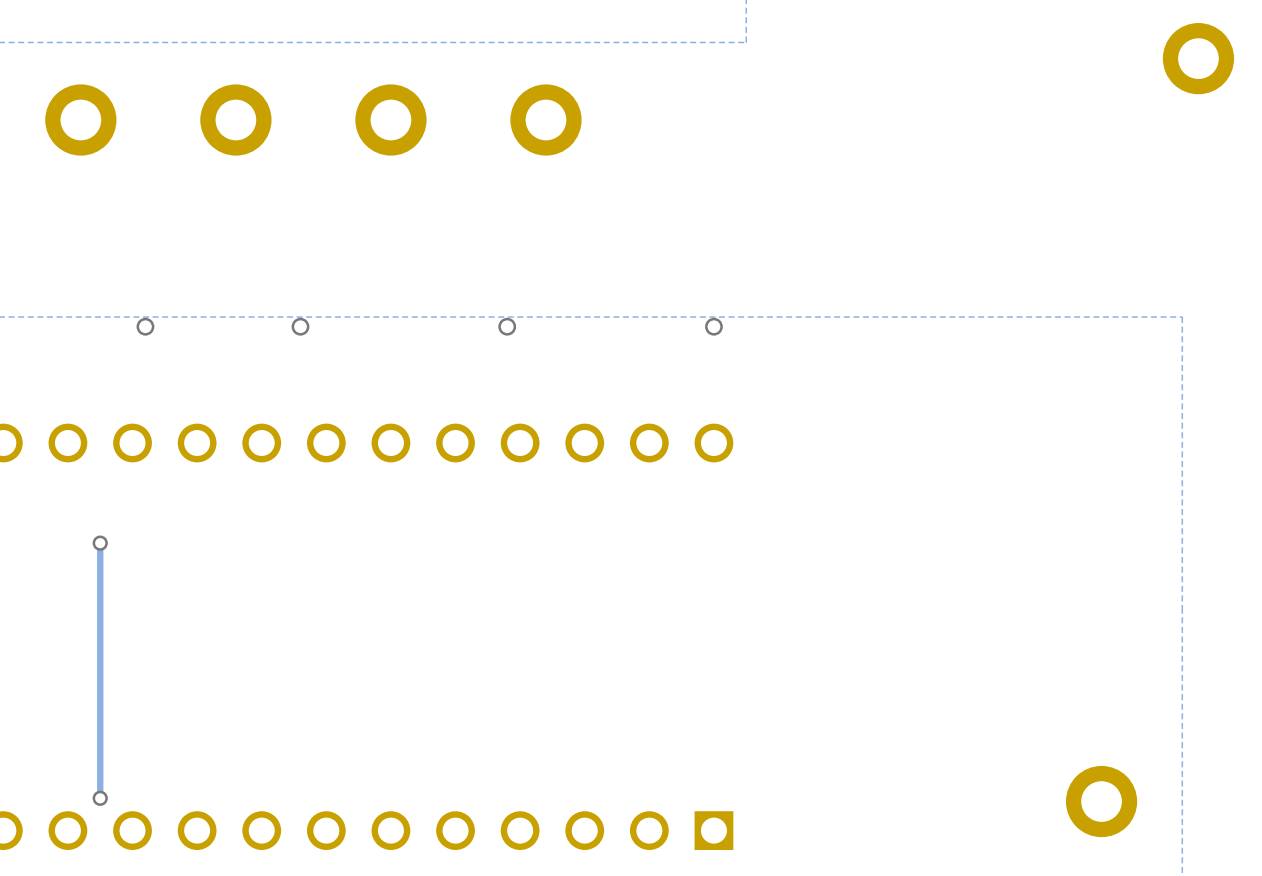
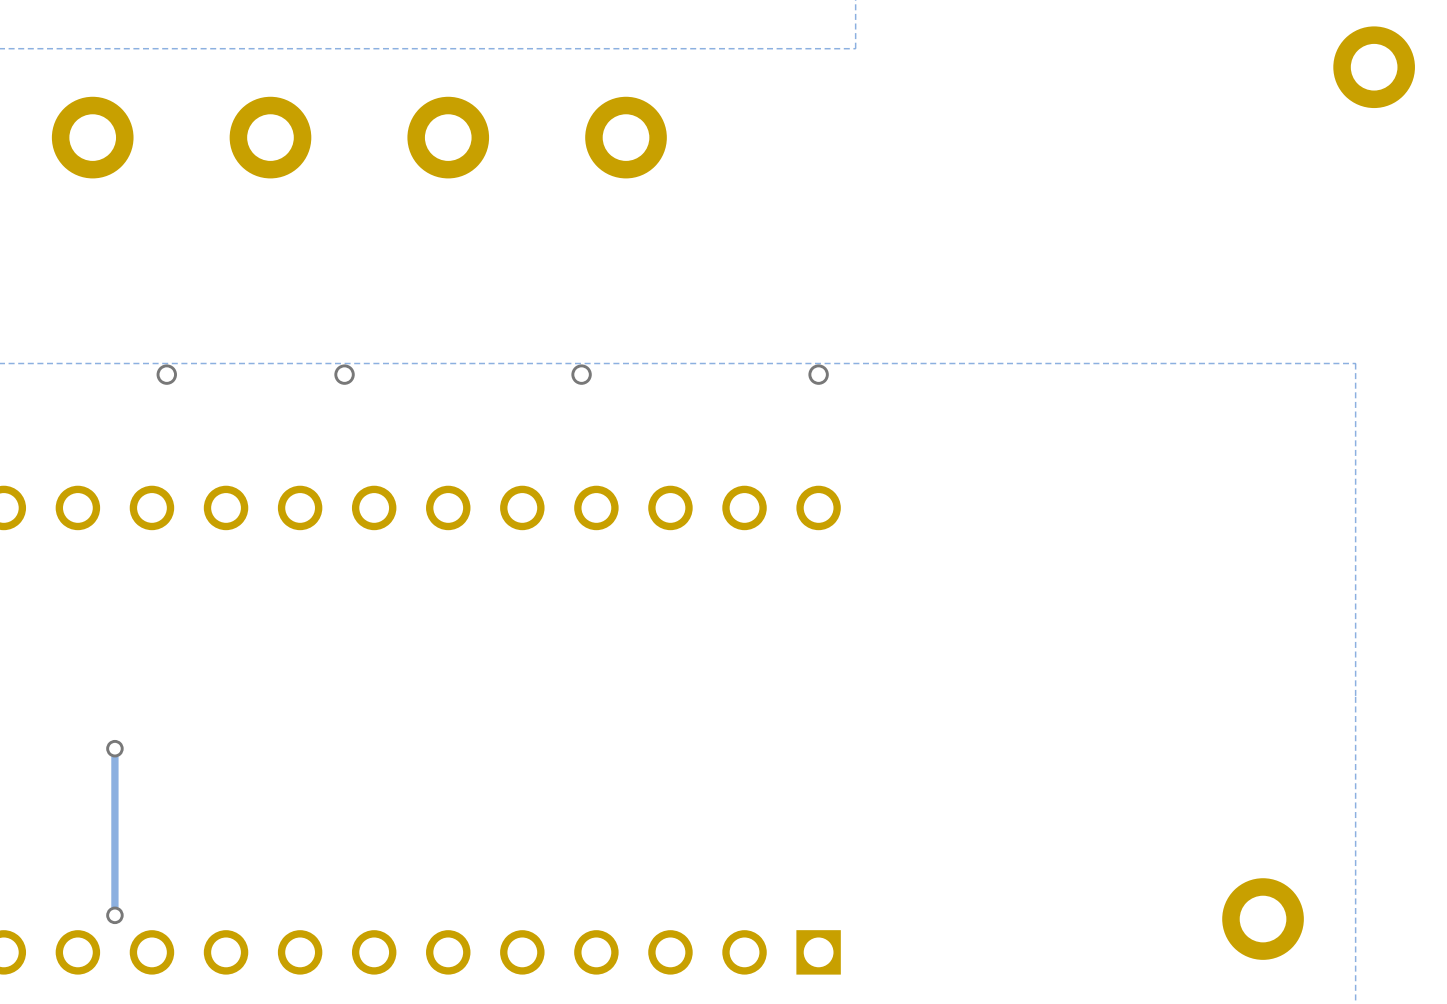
track: (100, 543) (100, 652) -> none
via position: (100, 543) -> (114, 748)

